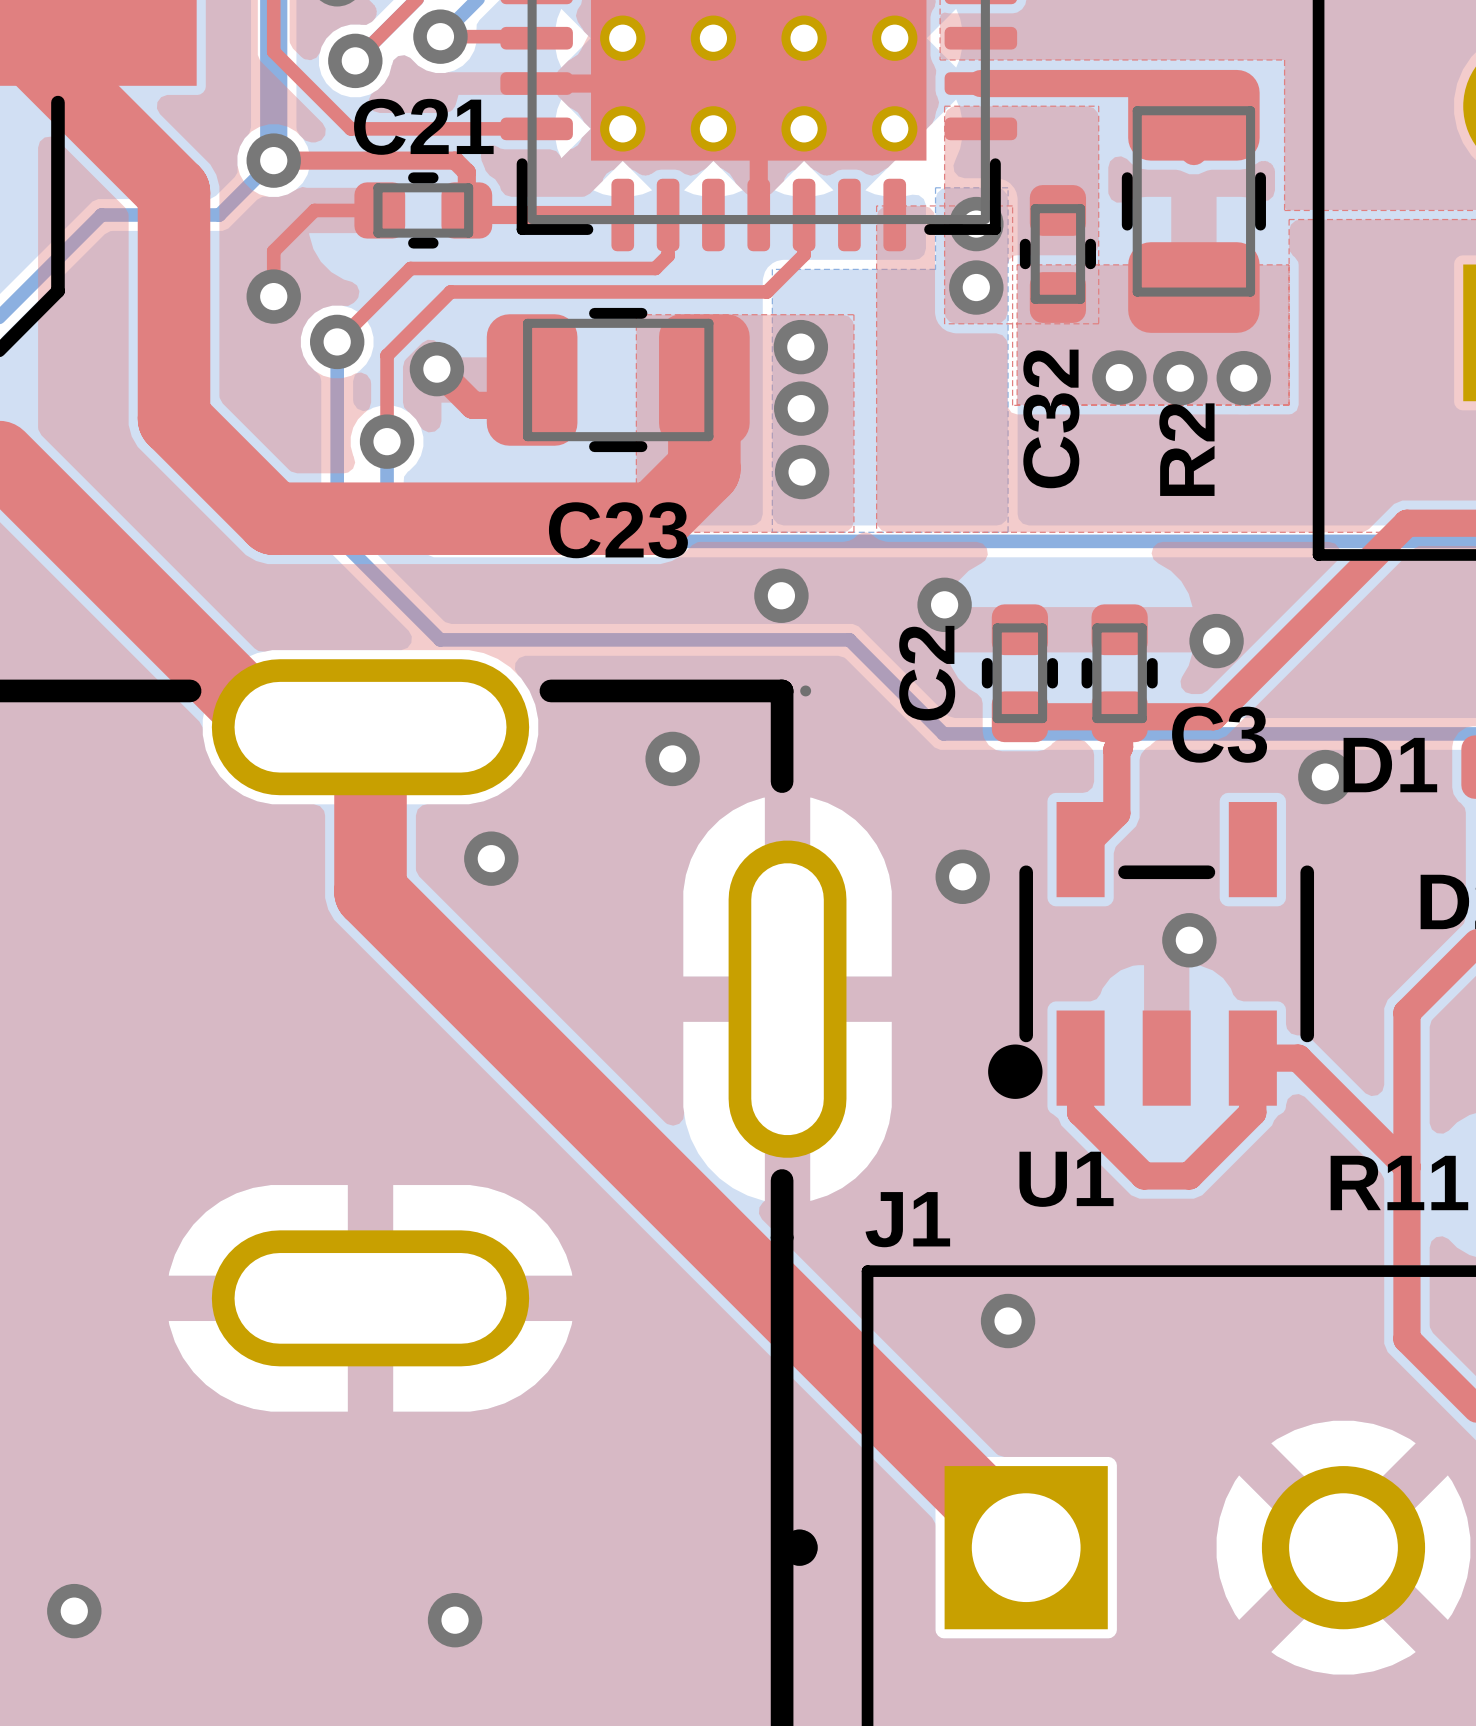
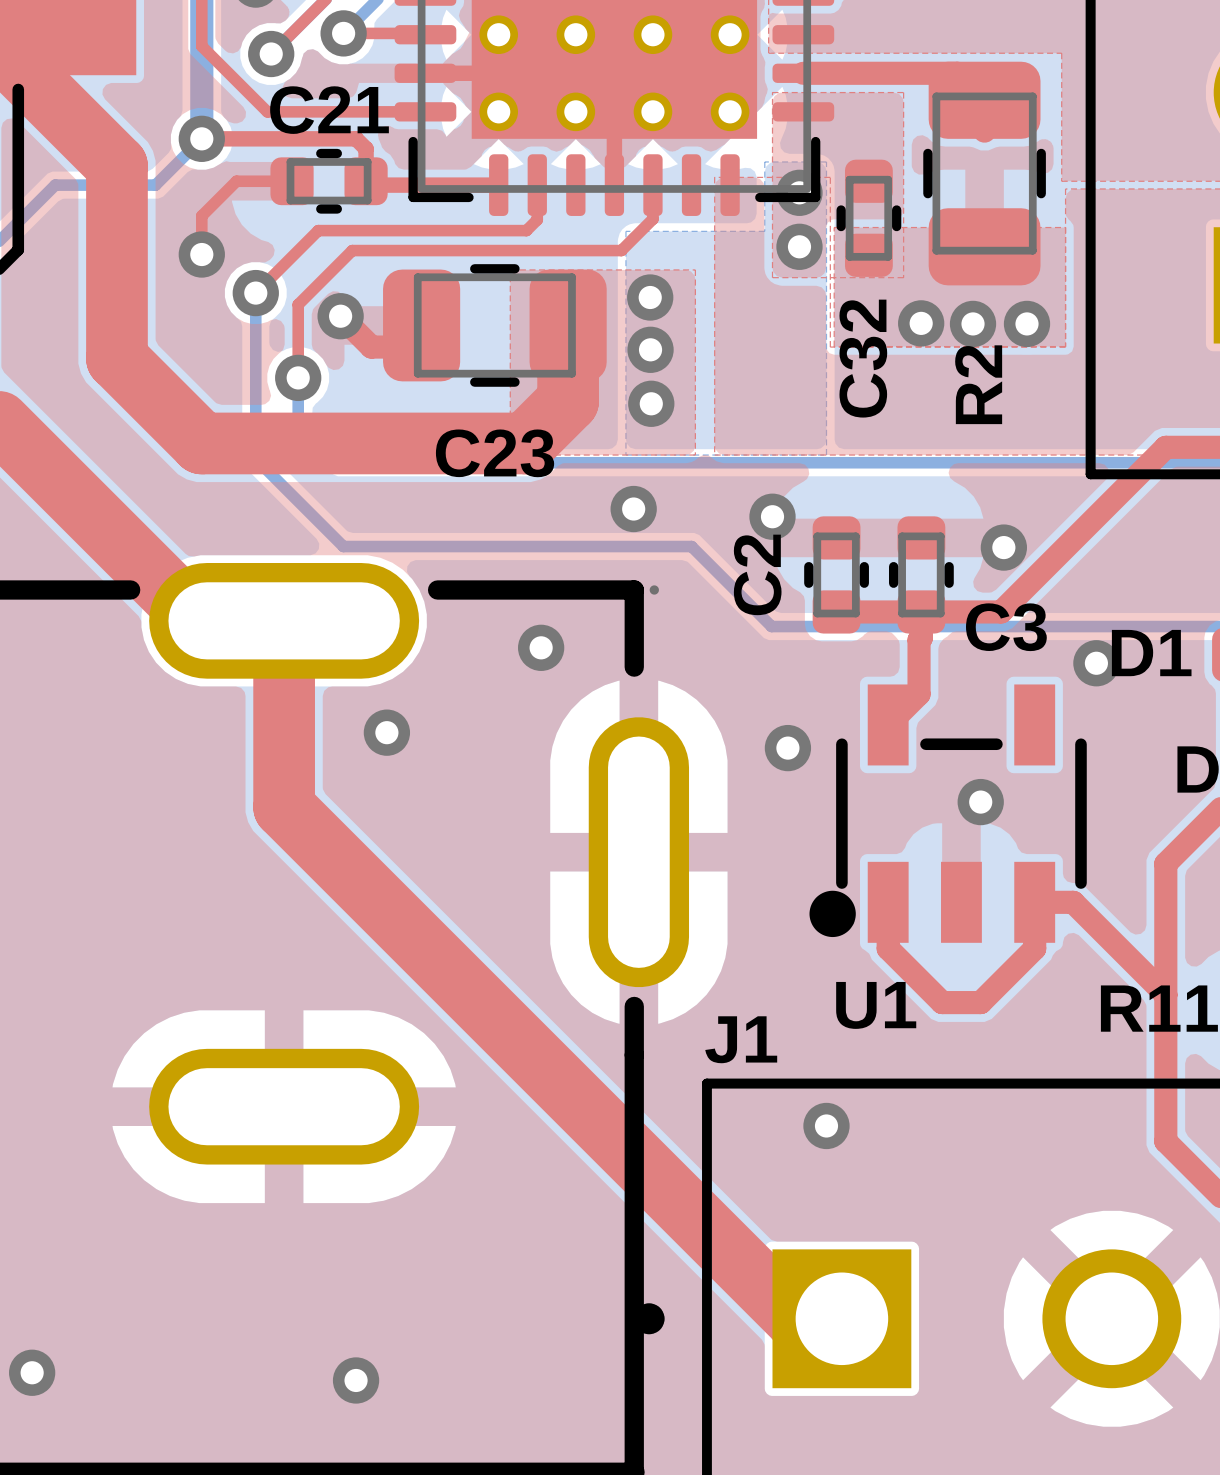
top track: (370, 891) (1026, 1547) -> (284, 761) (284, 807) (795, 1318) (841, 1318)

